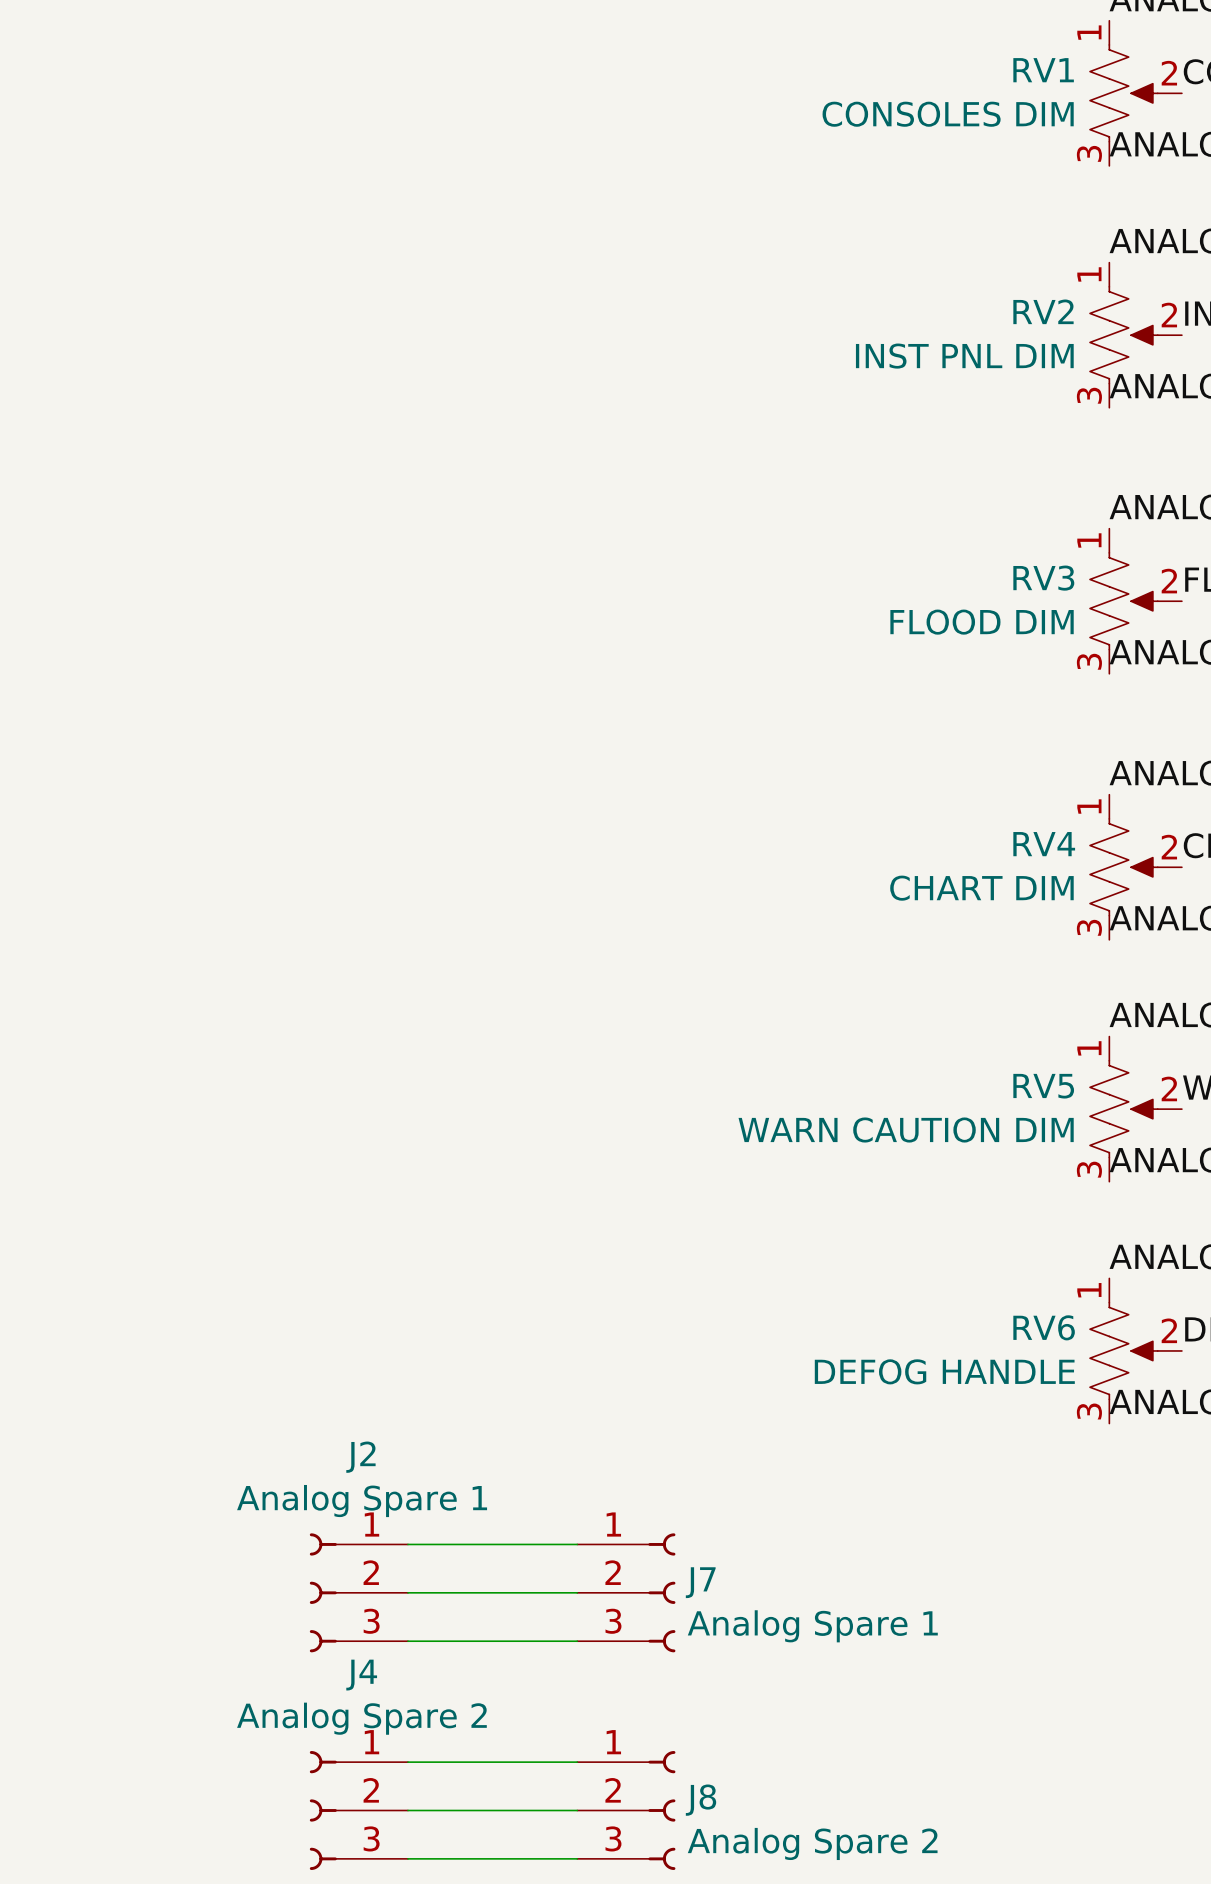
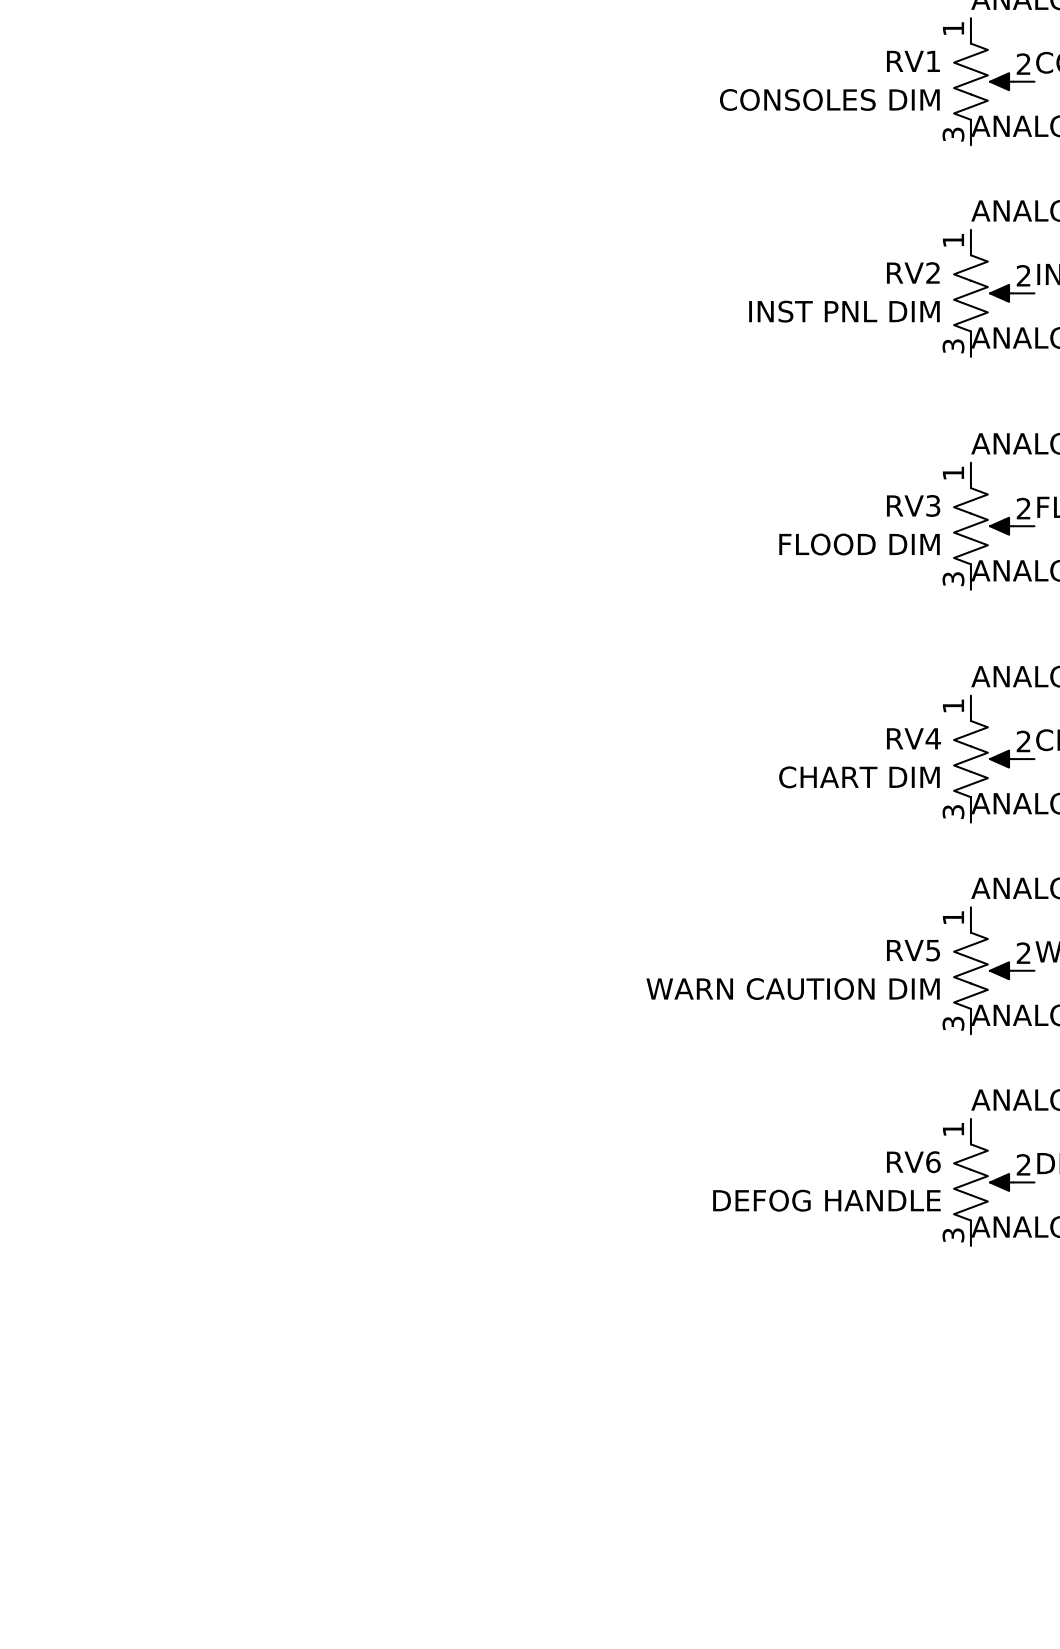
wire: (407, 1544) (577, 1544) -> none
J2: Analog Spare 1 (358, 1592) -> none
wire: (407, 1592) (577, 1592) -> none
J7: Analog Spare 1 (626, 1592) -> none
wire: (407, 1641) (577, 1641) -> none
wire: (407, 1762) (577, 1762) -> none
J4: Analog Spare 2 (358, 1810) -> none
wire: (407, 1810) (577, 1810) -> none
J8: Analog Spare 2 (626, 1810) -> none
wire: (407, 1858) (577, 1858) -> none

